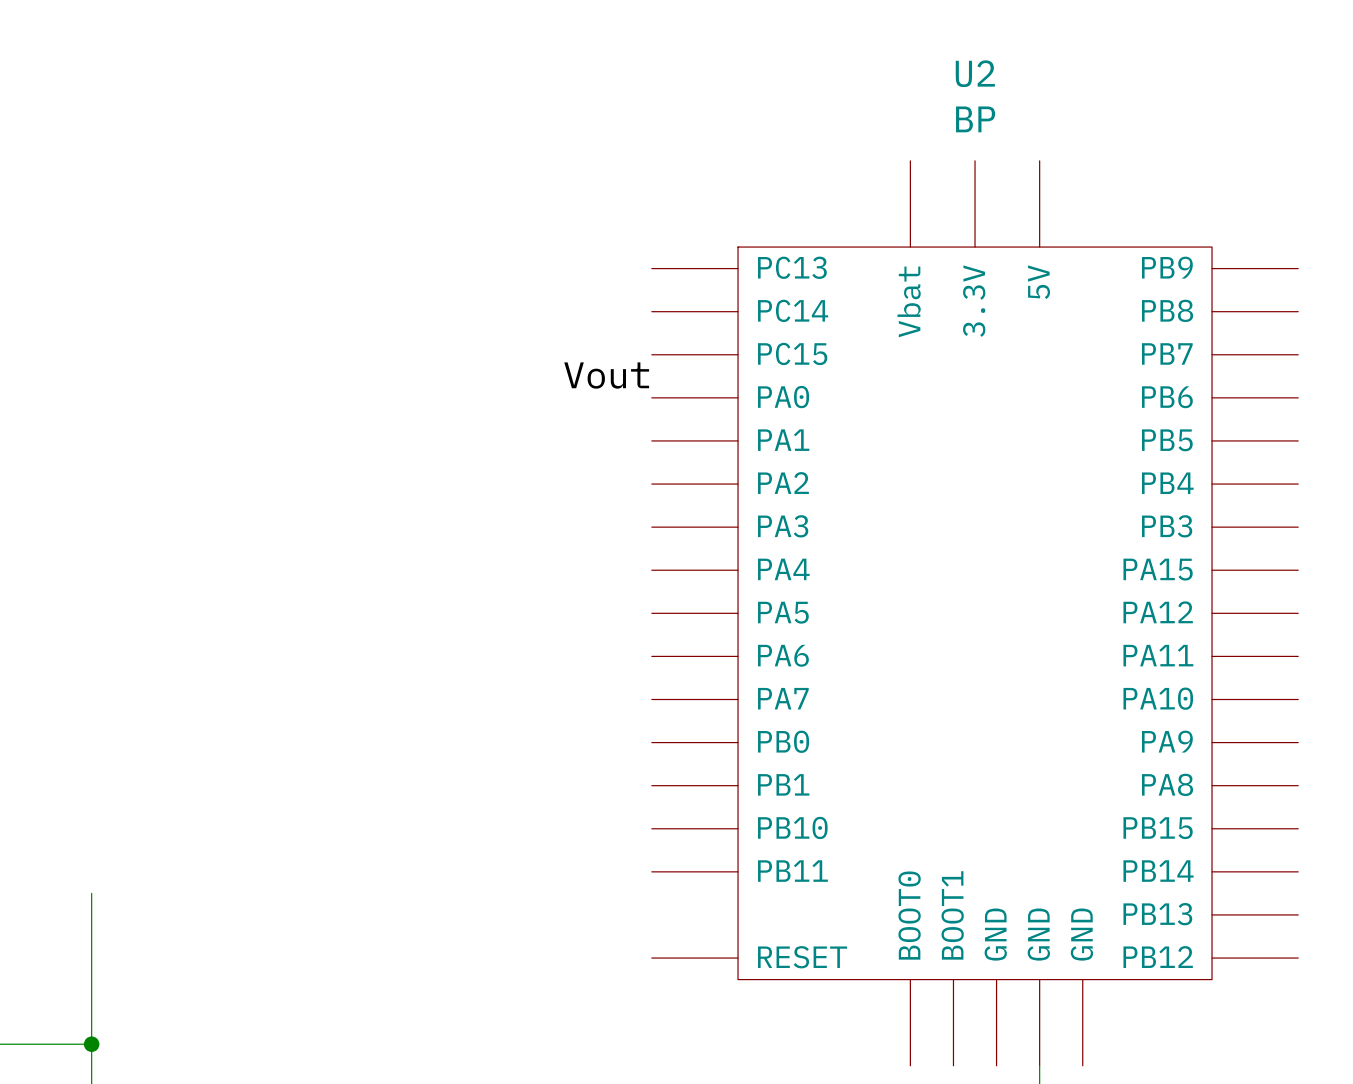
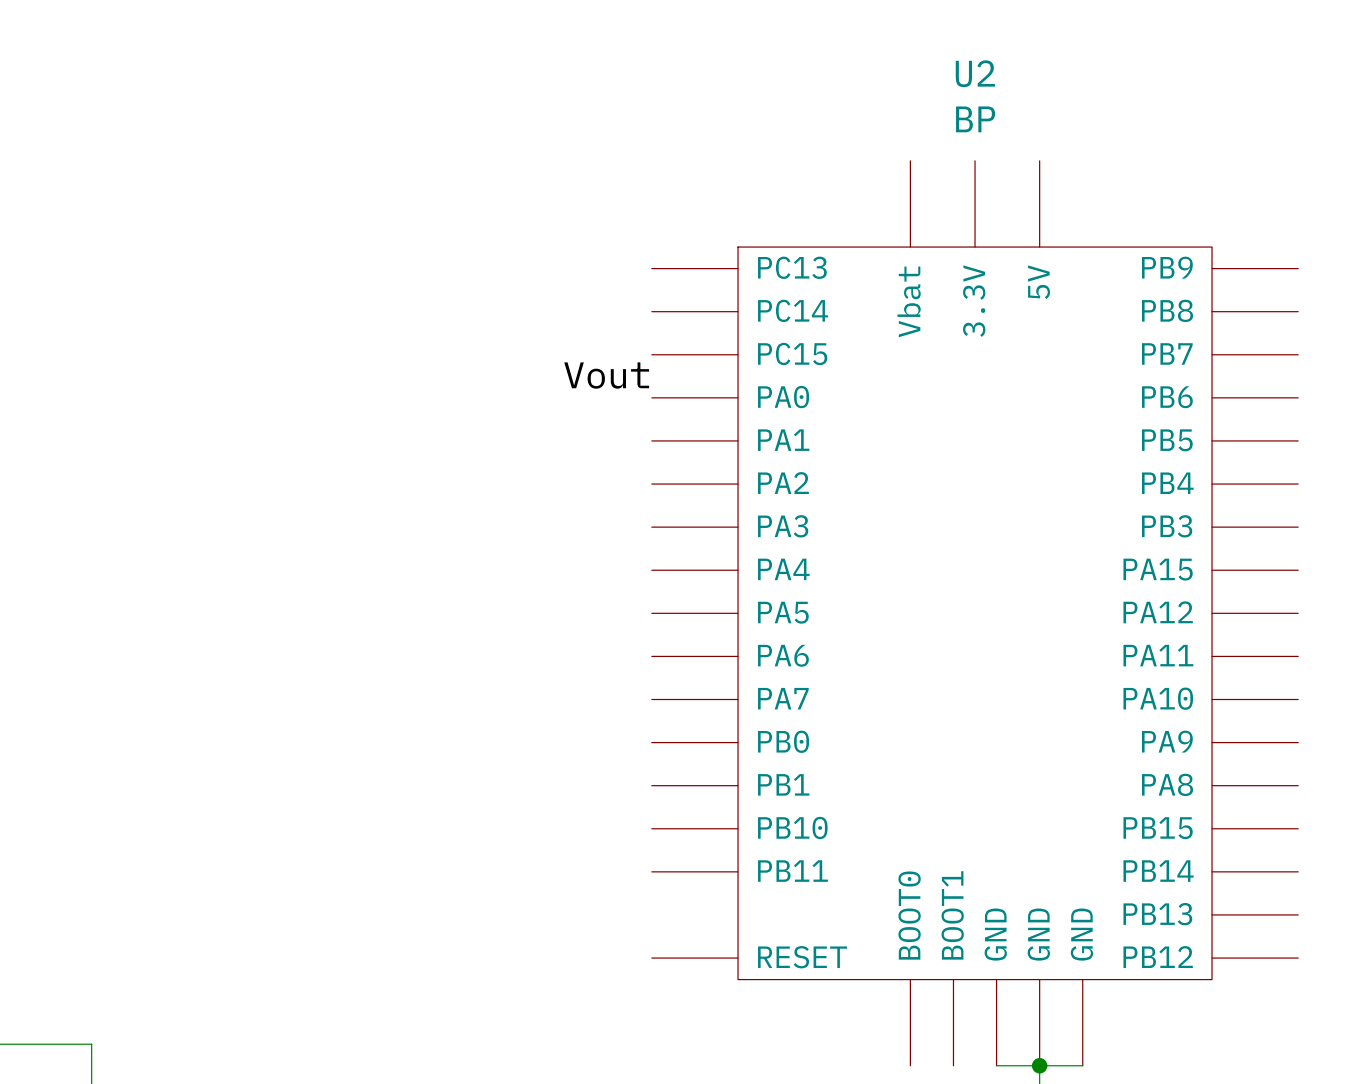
wire: (91, 893) (91, 1044) -> none
junction: (91, 1044) -> none
wire: none -> (996, 1065) (1082, 1065)
junction: none -> (1039, 1065)

